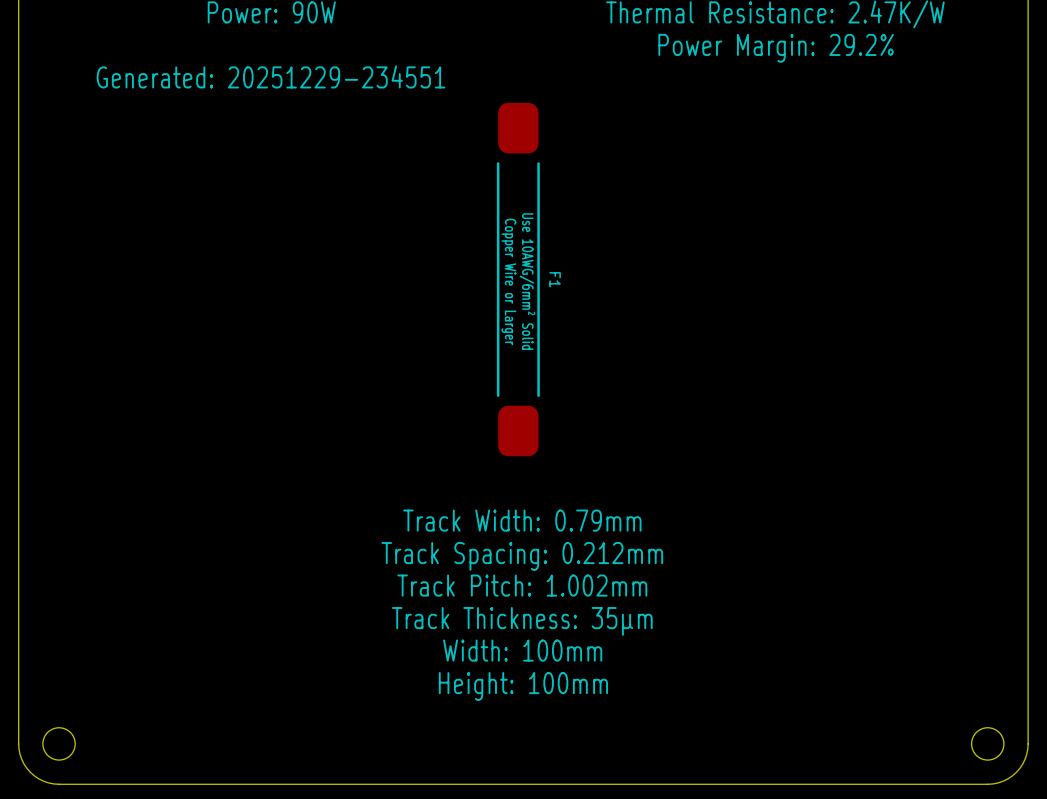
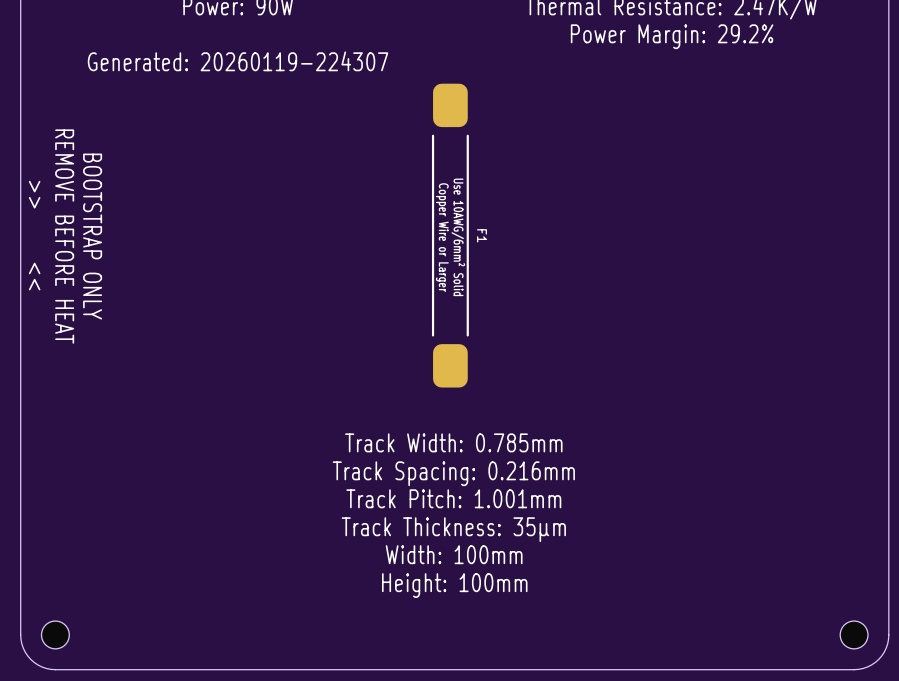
text: Generated: 20251229-234551 (271, 76) -> Generated: 20260119-224307 (238, 61)
text: none -> >> << (34, 235)
text: none -> REMOVE BEFORE HEAT (64, 236)
text: none -> BOOTSTRAP ONLY (92, 236)
text: Track Width: 0.79mm (522, 520) -> Track Width: 0.785mm (453, 442)
text: Track Spacing: 0.212mm (522, 556) -> Track Spacing: 0.216mm (453, 473)
text: Track Pitch: 1.002mm (522, 585) -> Track Pitch: 1.001mm (453, 498)

